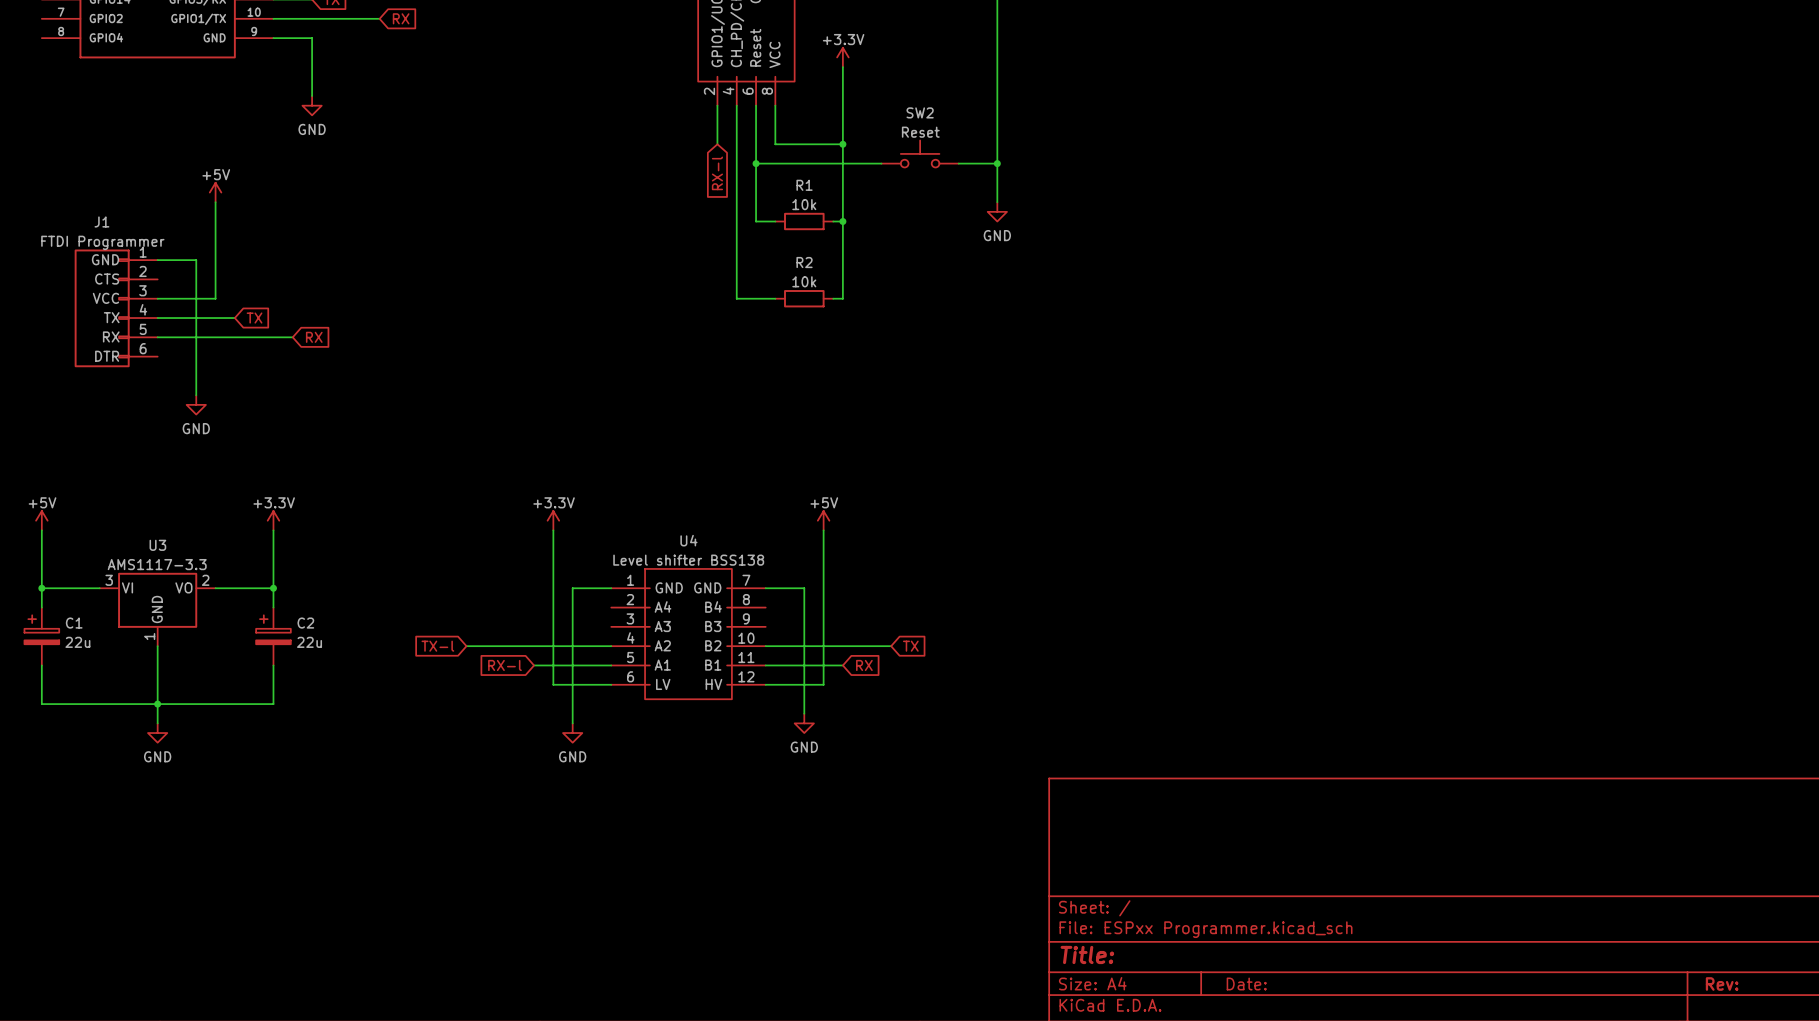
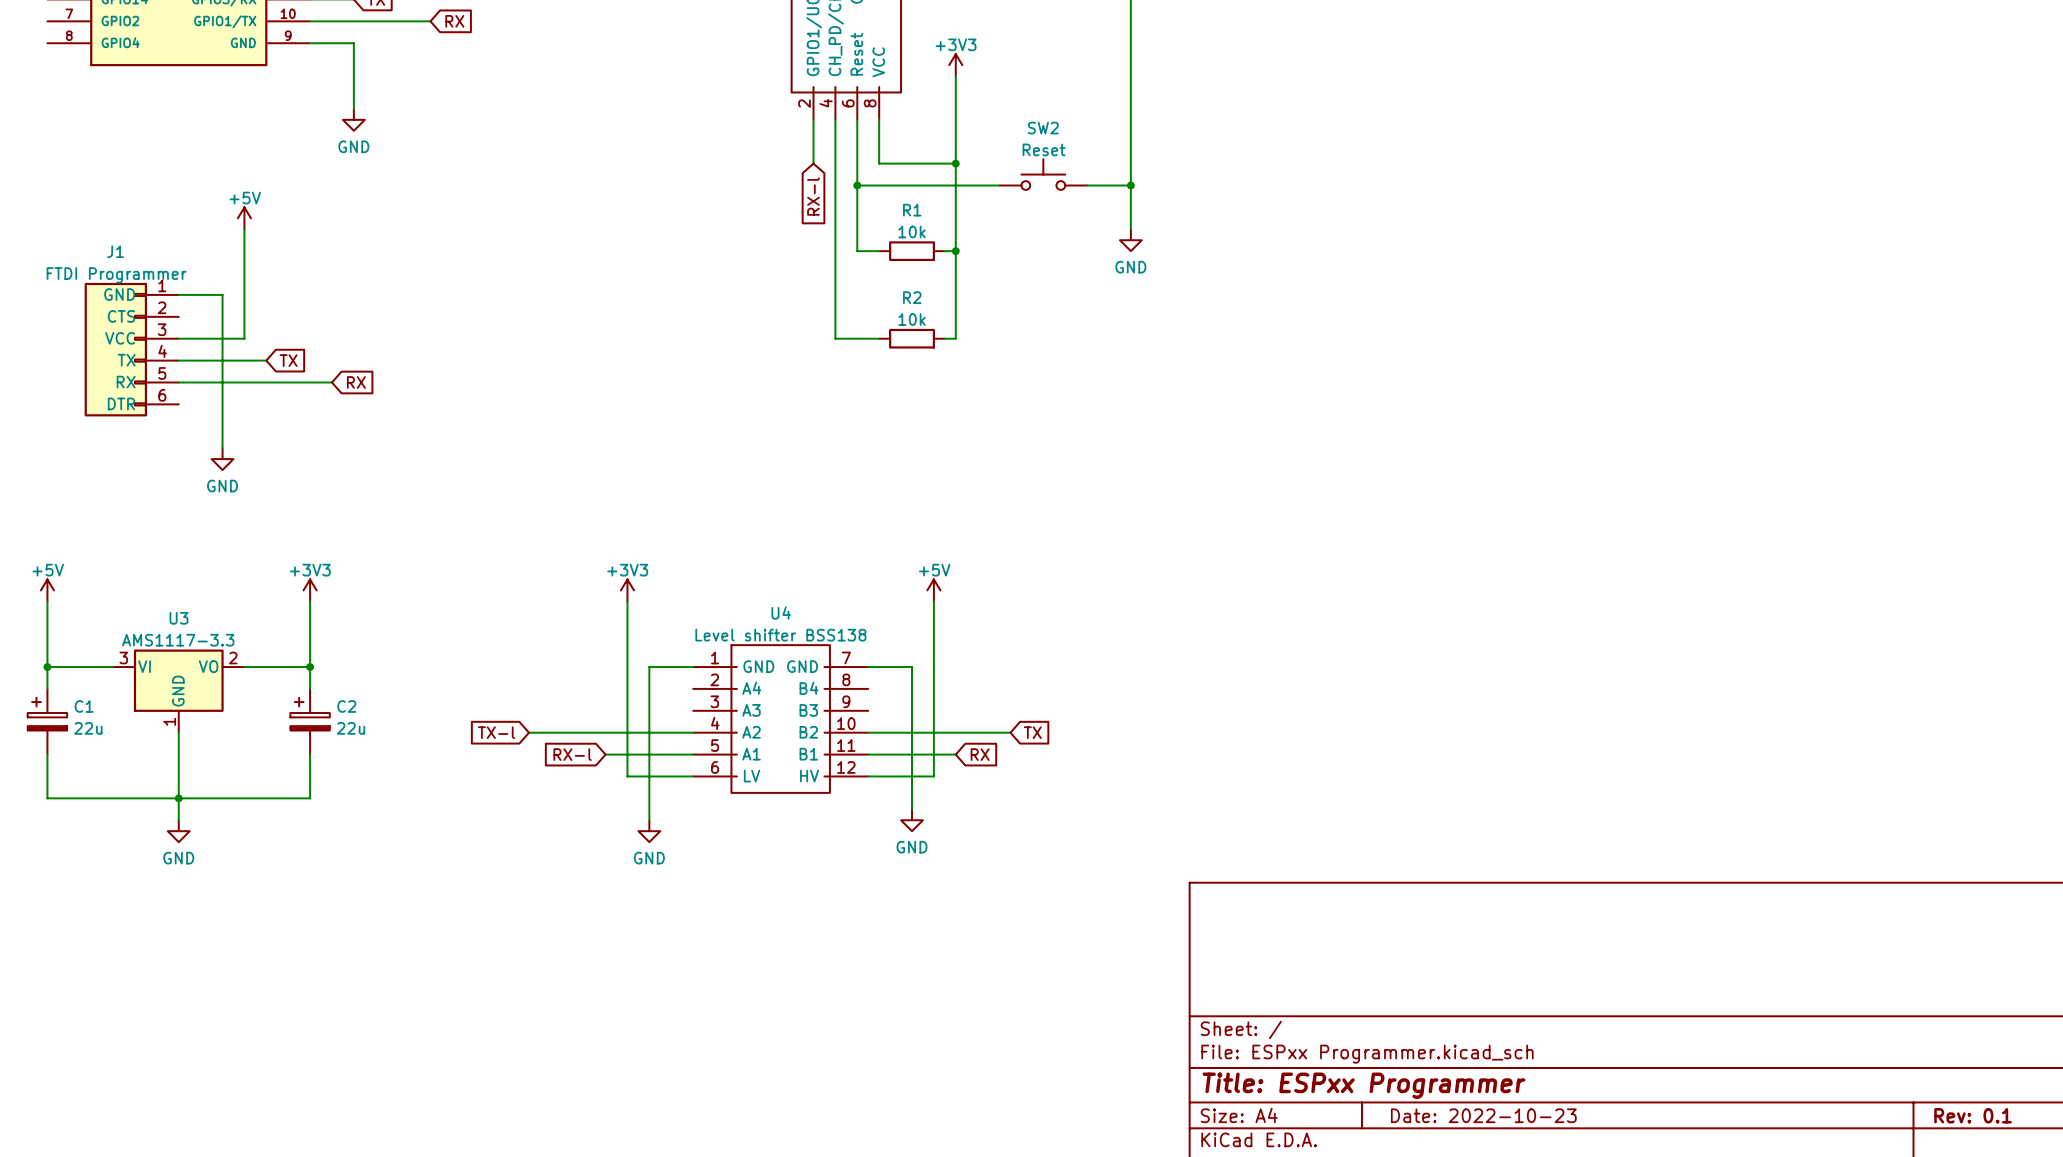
power symbol: +3.3V (842, 57) -> +3V3 (955, 65)
power symbol: +3.3V (273, 520) -> +3V3 (310, 590)
power symbol: +3.3V (553, 520) -> +3V3 (627, 590)
title block: Title: (1087, 954) -> Title: ESPxx Programmer (1364, 1085)
title block: Date: (1246, 984) -> Date: 2022-10-23 (1483, 1115)
title block: Rev: (1722, 984) -> Rev: 0.1 (1973, 1115)

